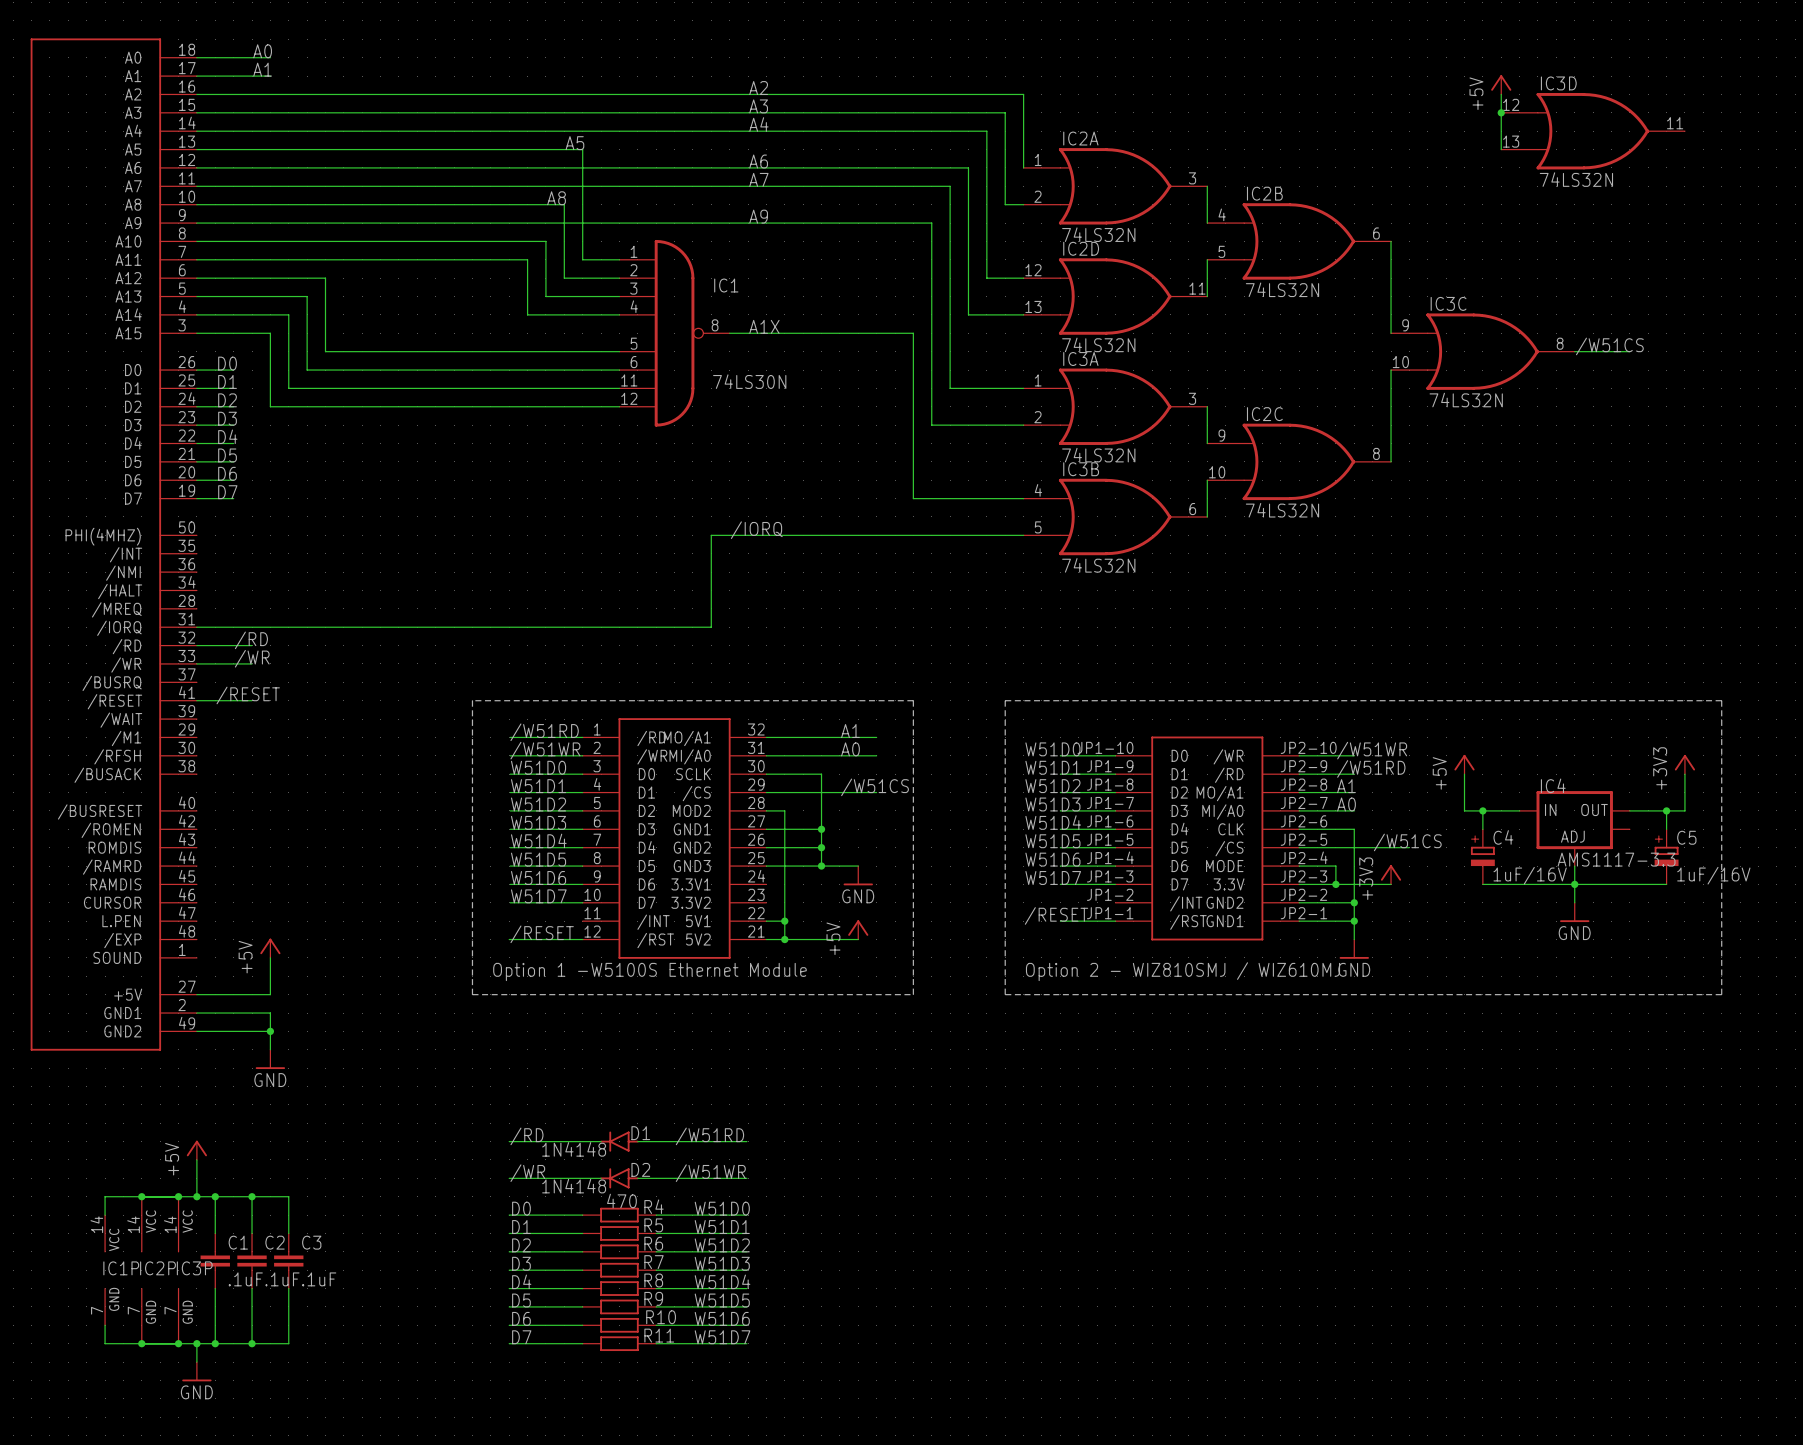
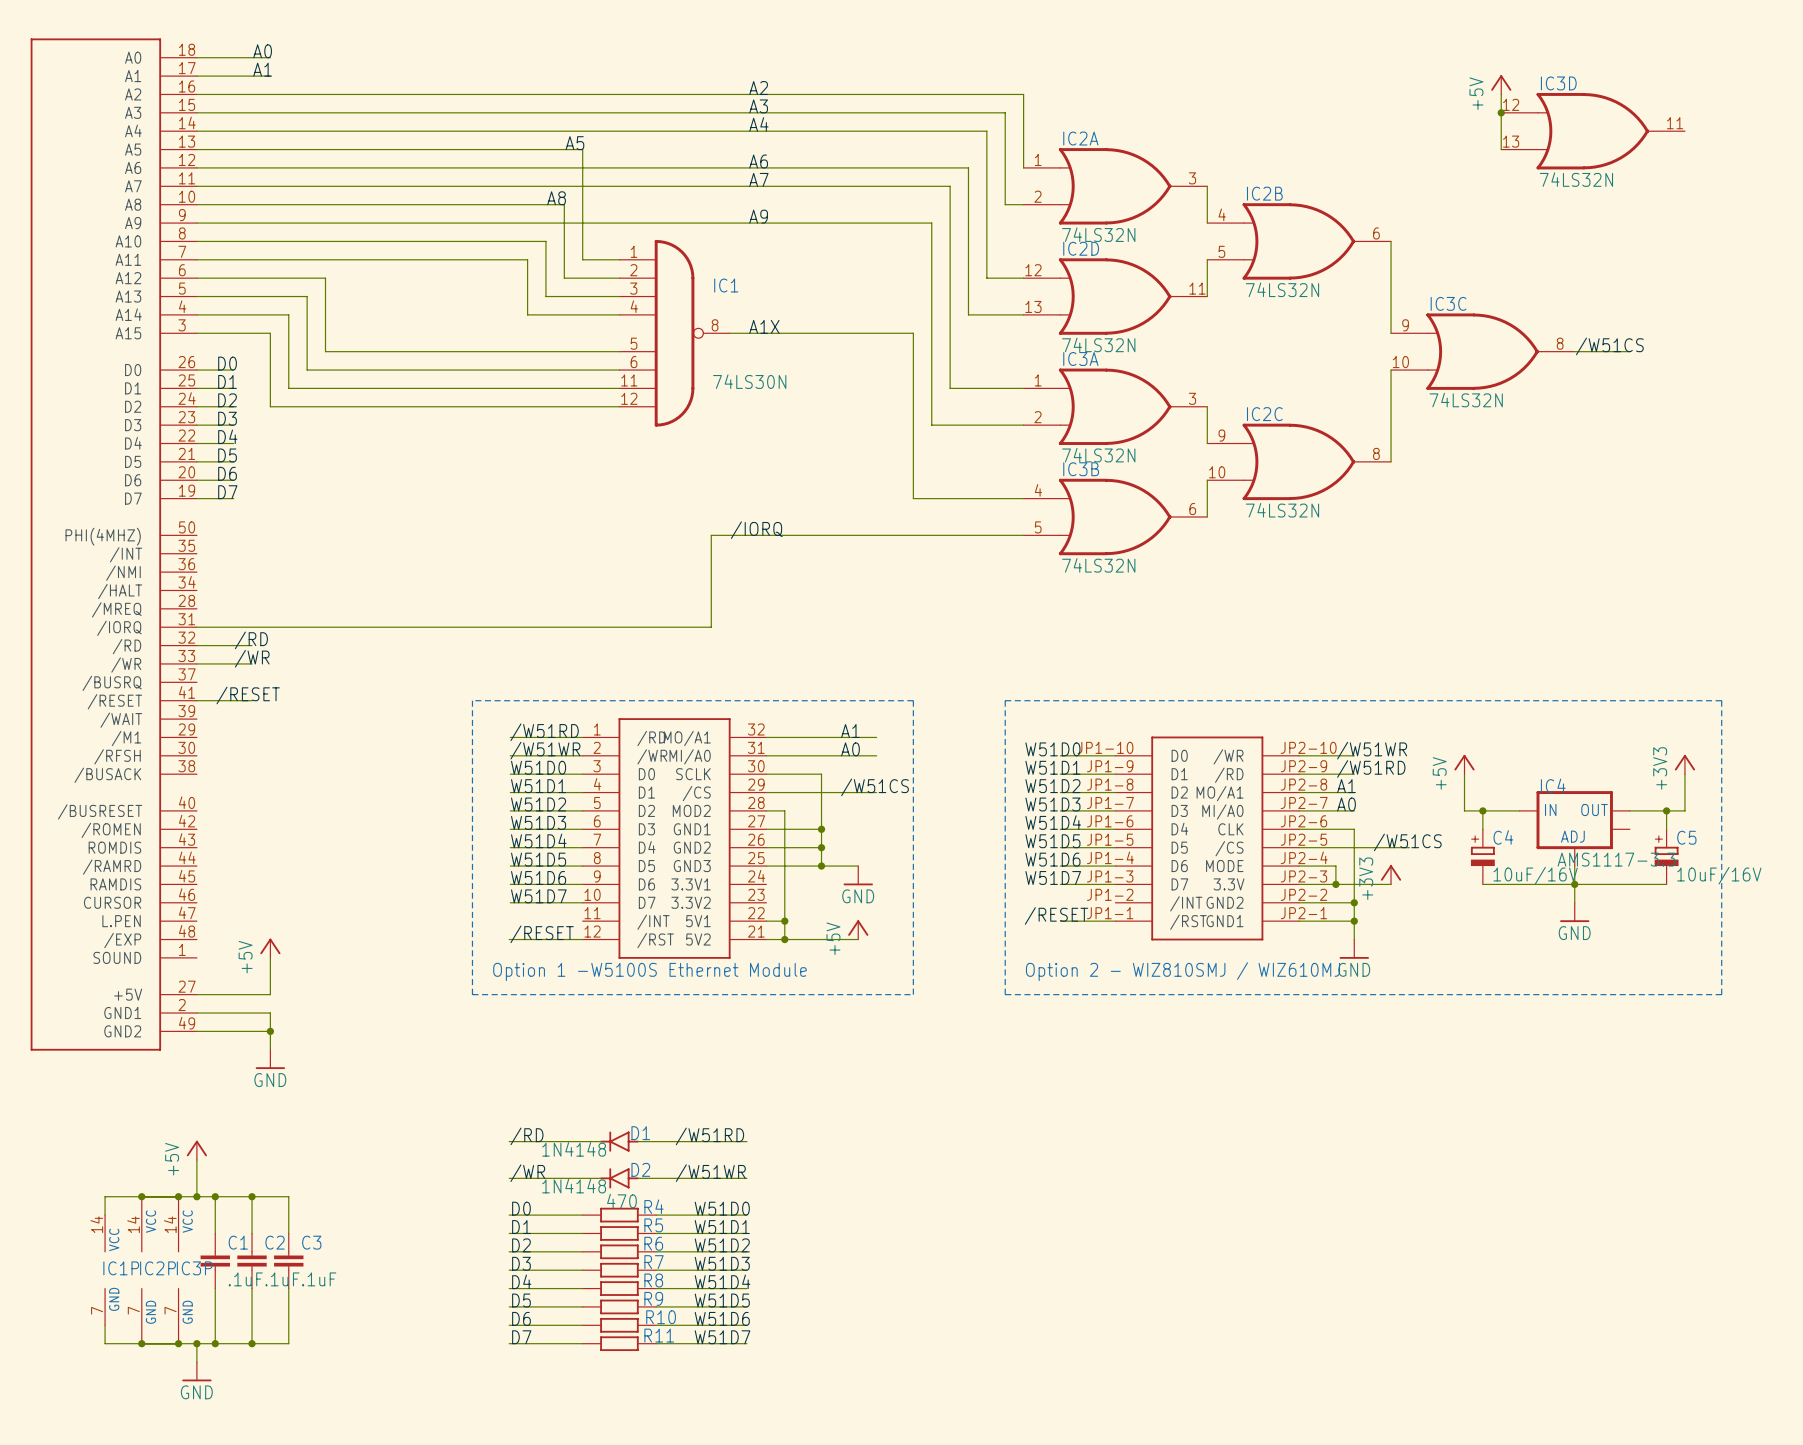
C4 value: 1uF/16V (1530, 875) -> 10uF/16V (1535, 875)
C5 value: 1uF/16V (1713, 875) -> 10uF/16V (1719, 875)

